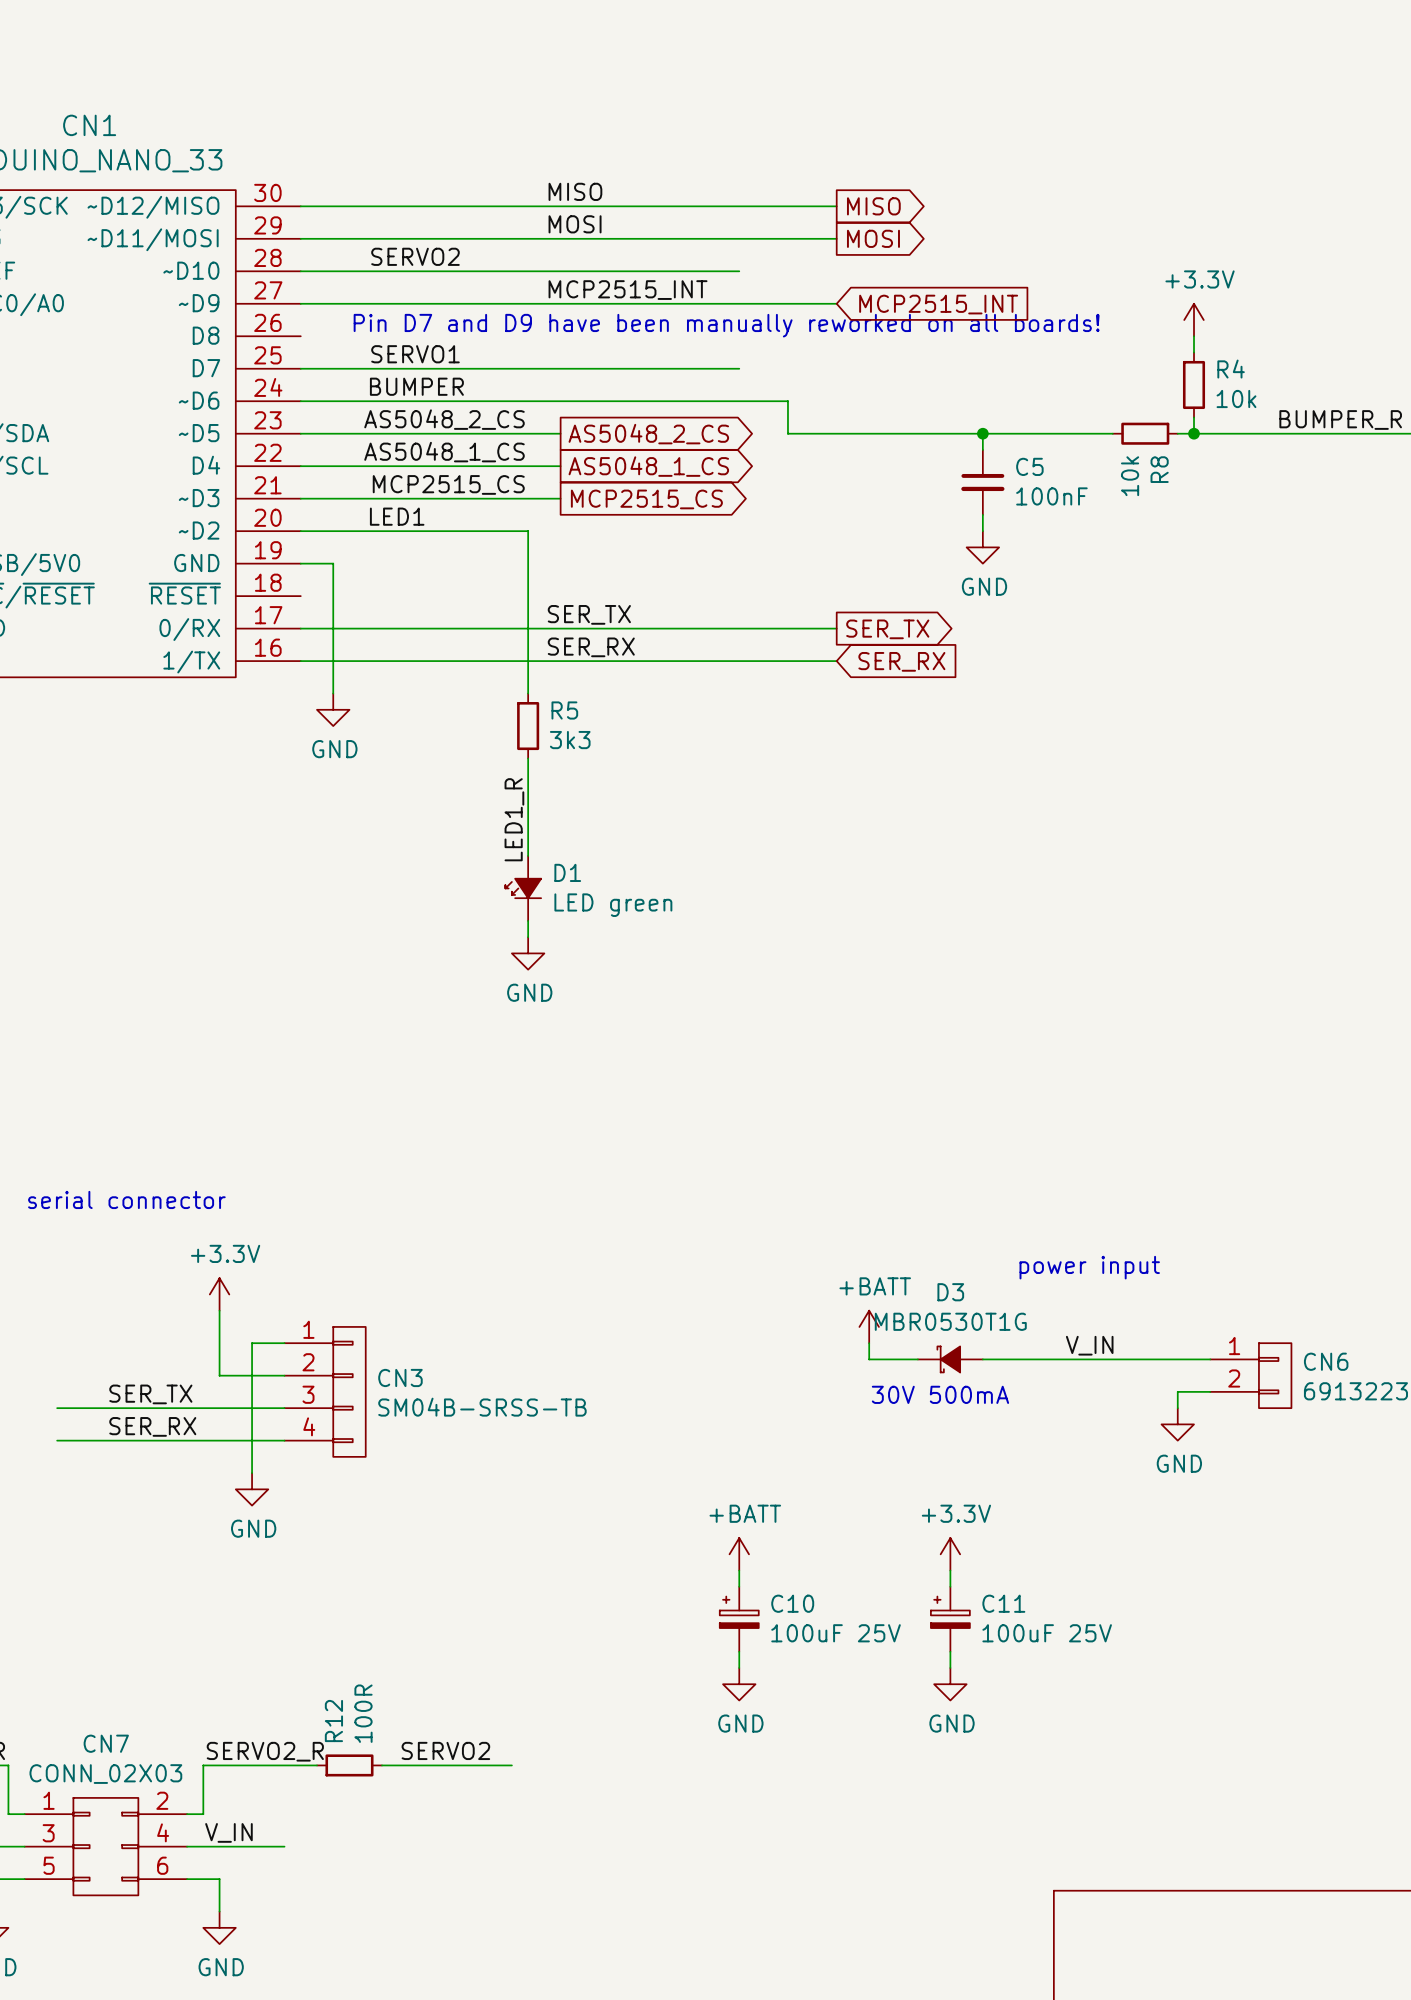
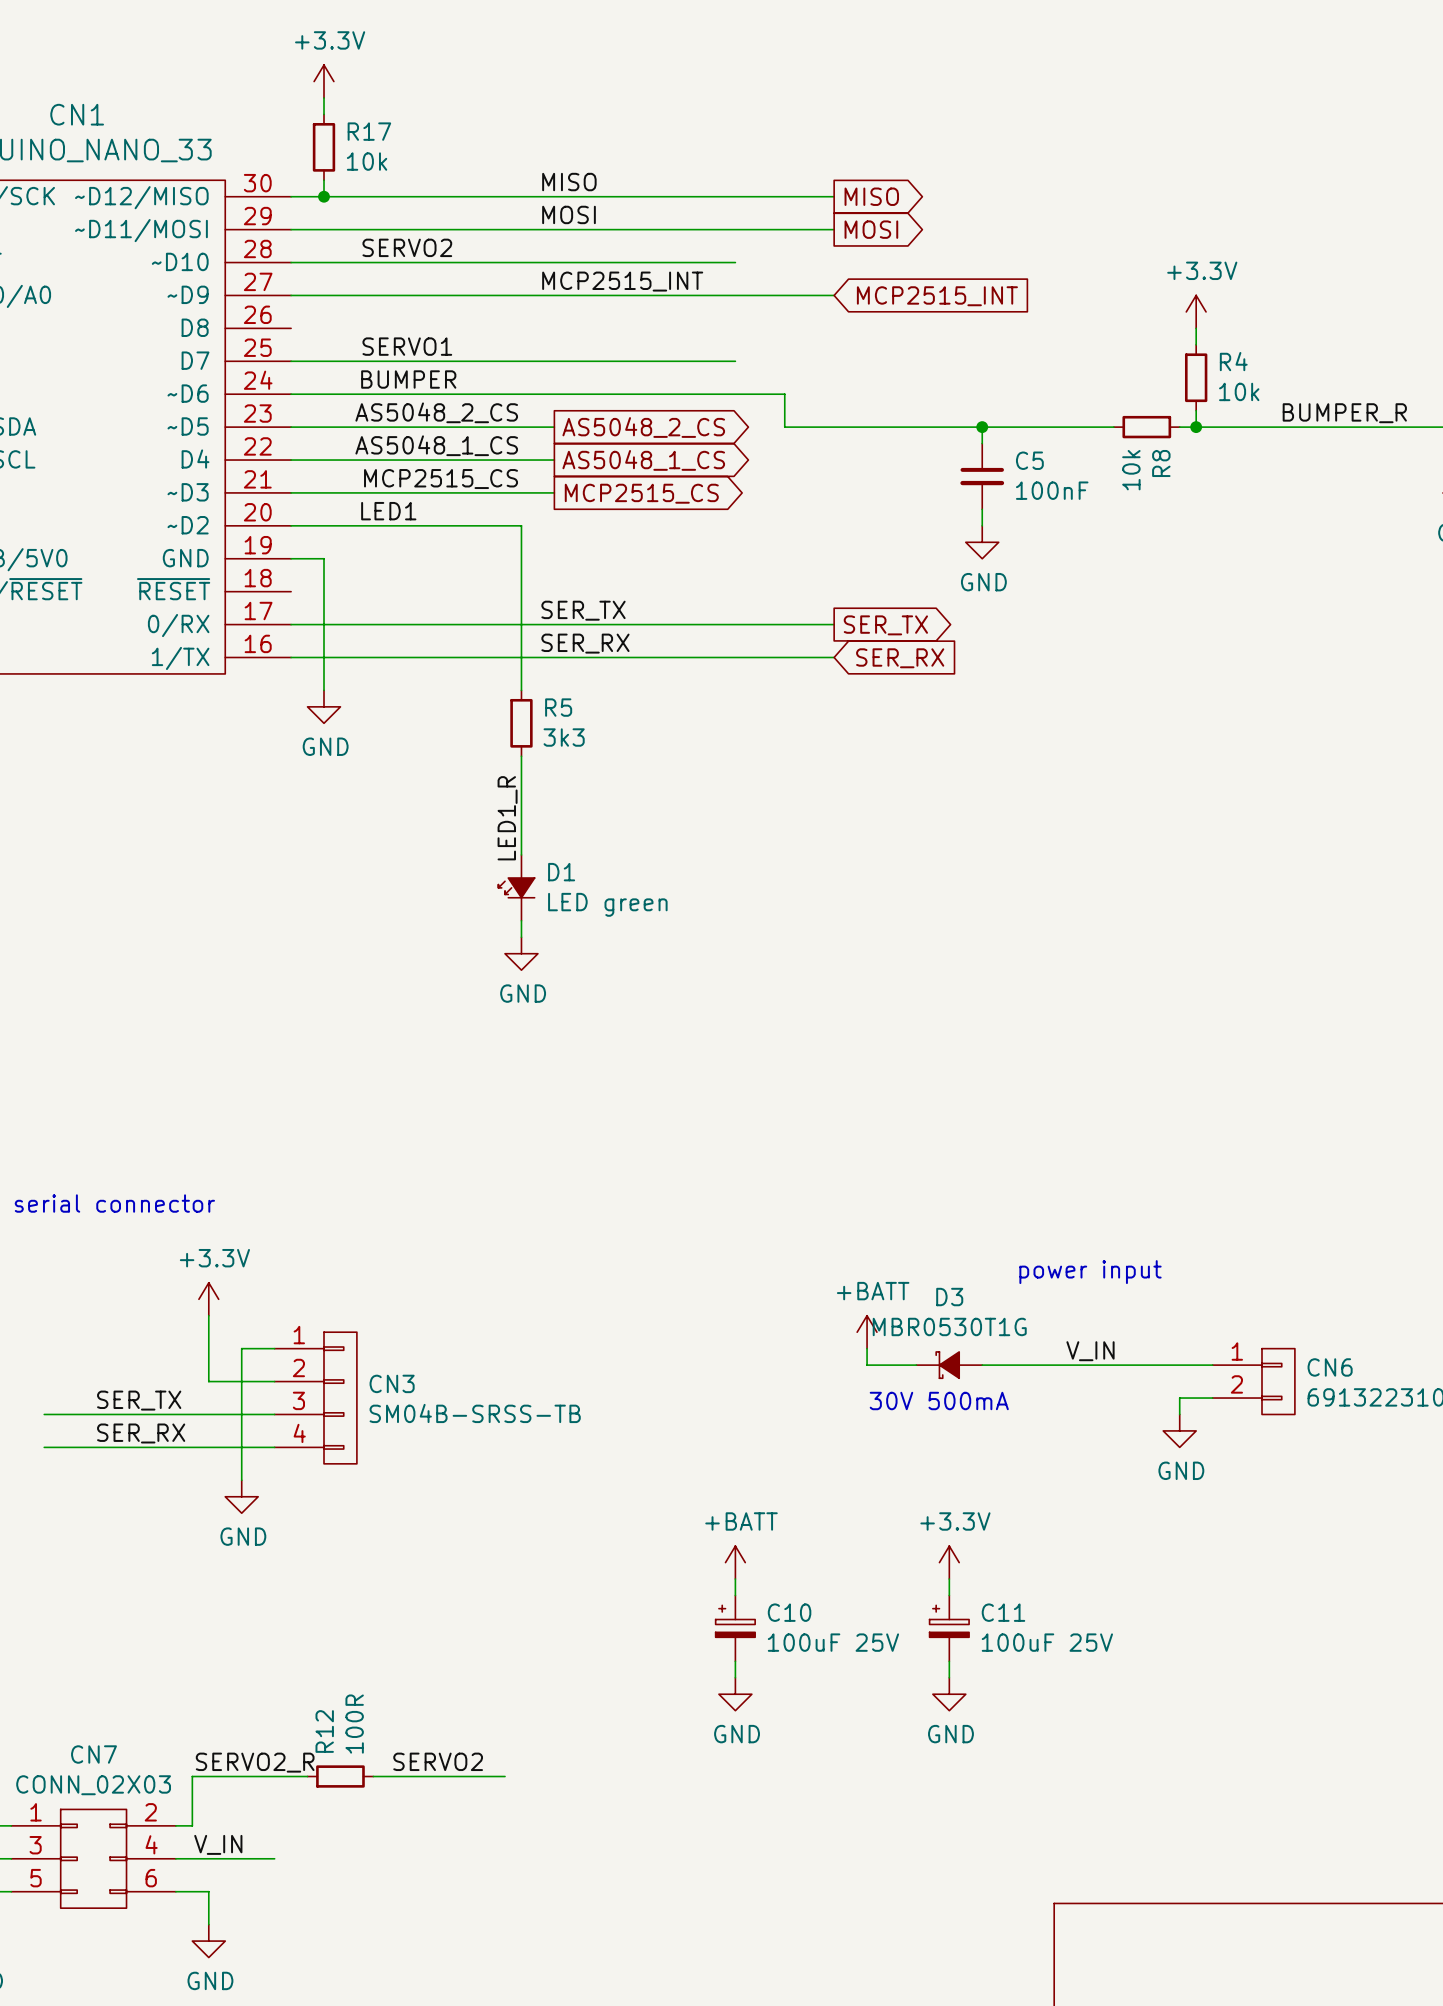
power symbol: none -> +3.3V (323, 81)
wire: none -> (323, 97) (323, 114)
R17: none -> 10k (323, 147)
wire: none -> (323, 180) (323, 196)
junction: none -> (323, 196)
text: Pin D7 and D9 have been manually reworked on all boards! (726, 325) -> none

